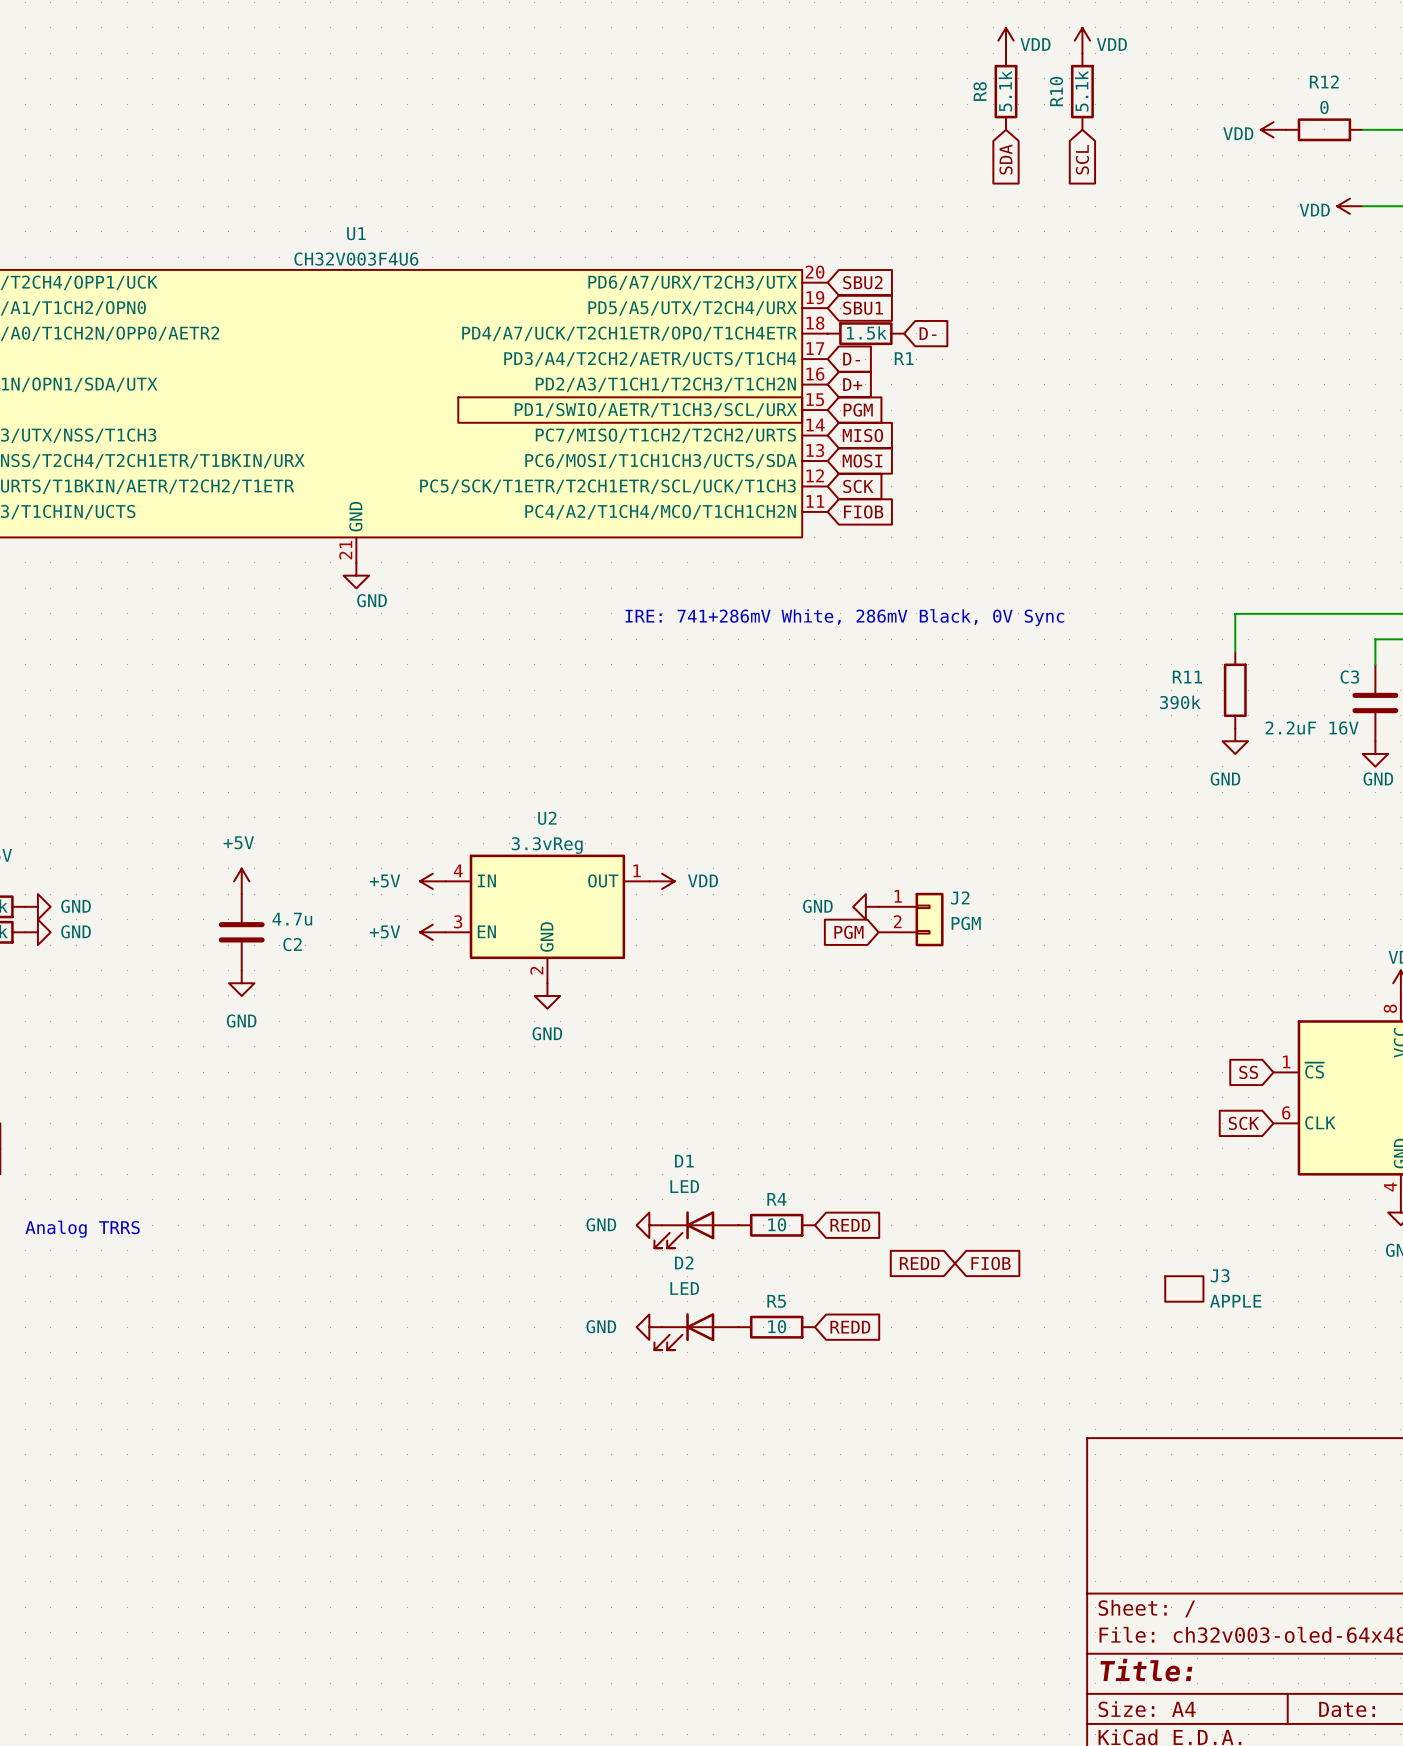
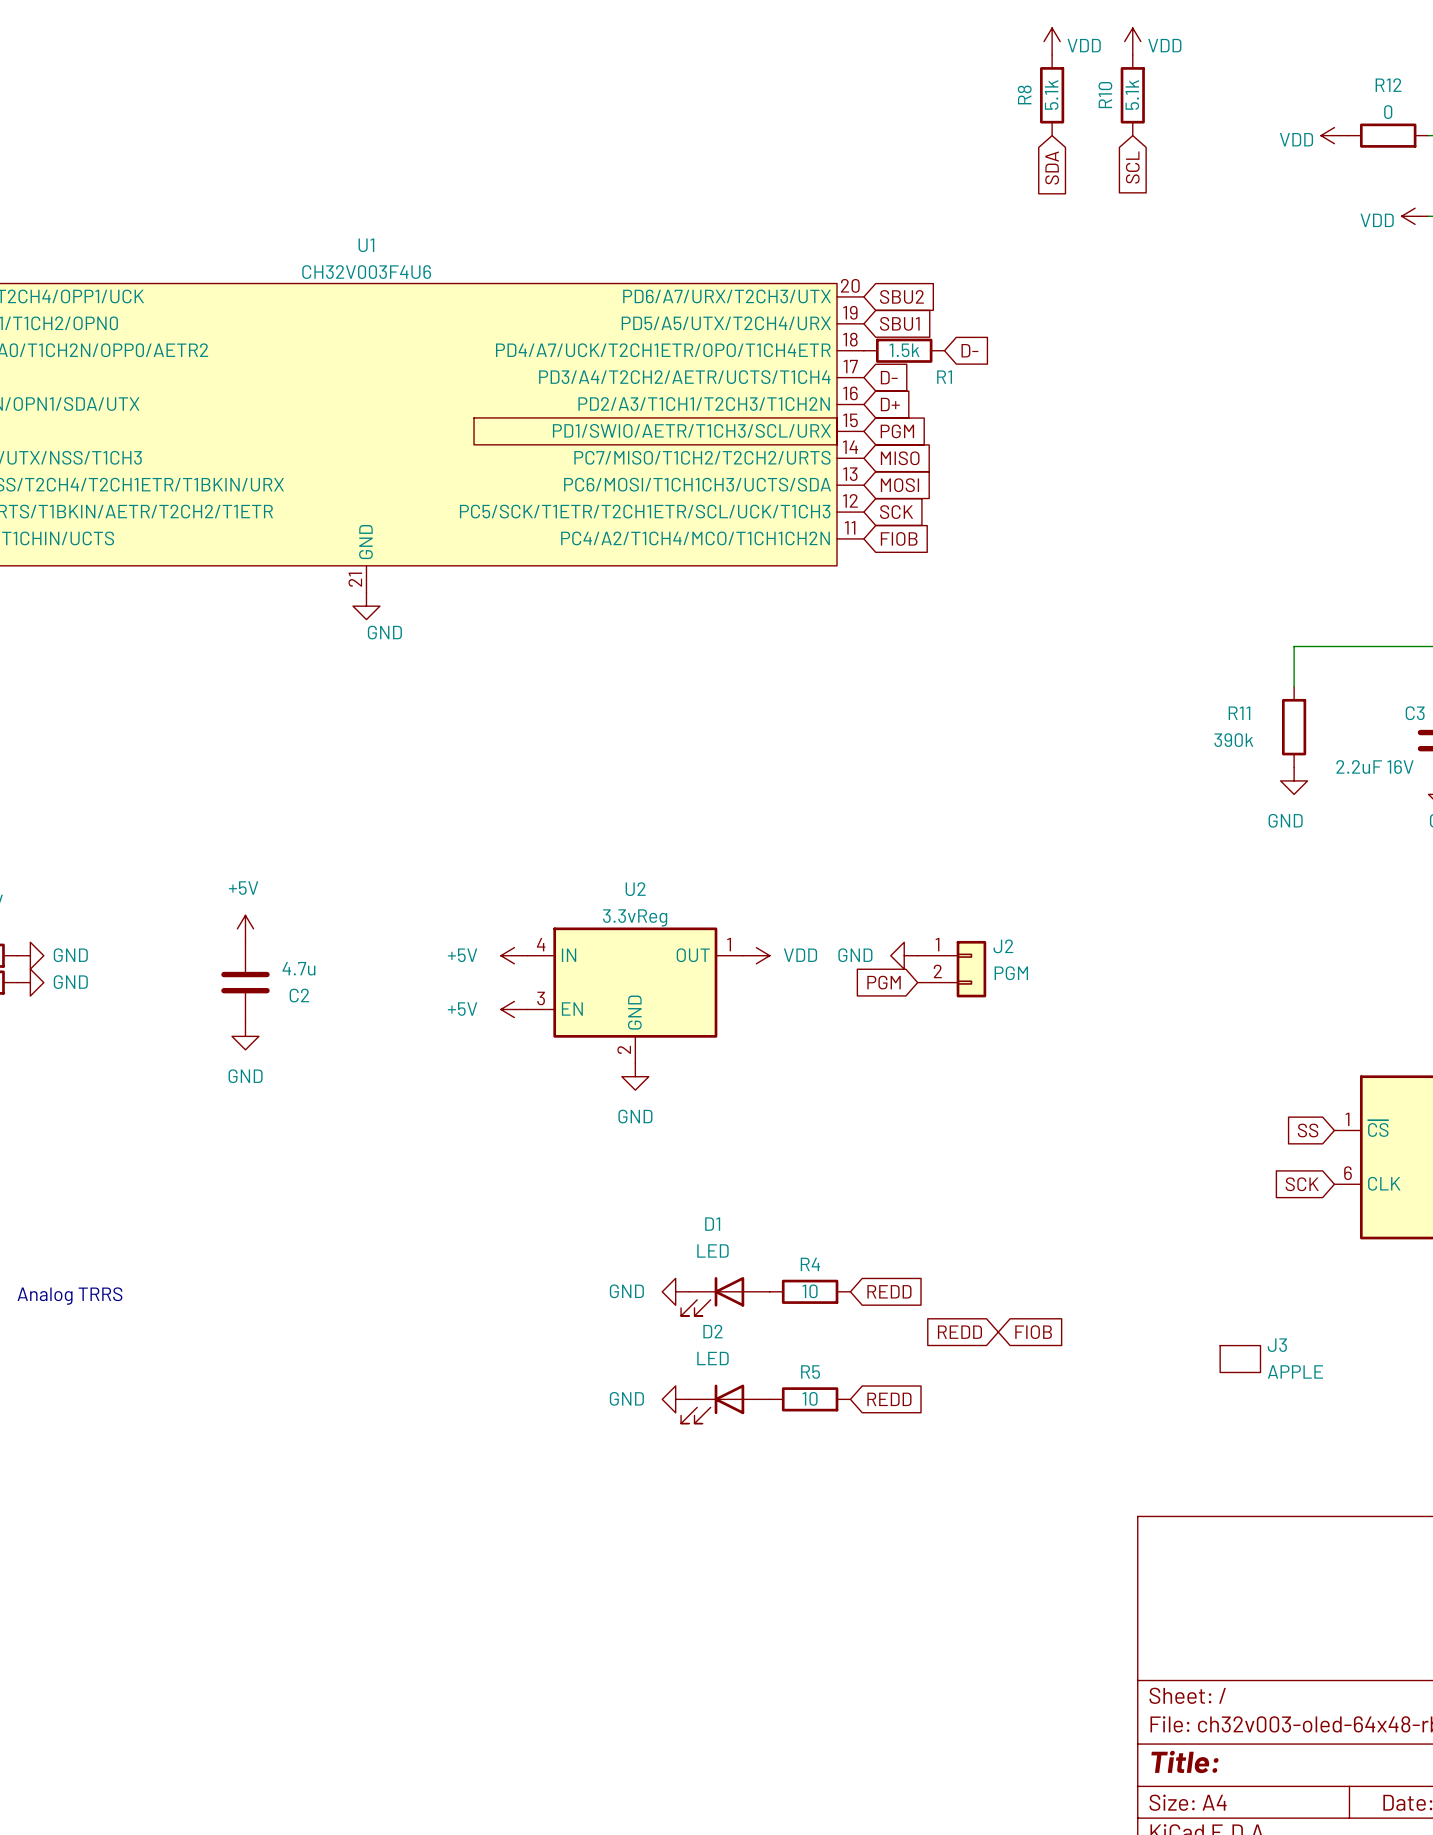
text: IRE: 741+286mV White, 286mV Black, 0V Sync (844, 617) -> none
power symbol: +5V (432, 881) -> none
power symbol position: VDD (662, 881) -> VDD (756, 955)
power symbol: none -> +5V (514, 955)
U2 position: (547, 918) -> (635, 995)
power symbol: +5V (432, 932) -> none
power symbol: none -> +5V (514, 1009)
power symbol position: GND (547, 995) -> GND (635, 1076)

